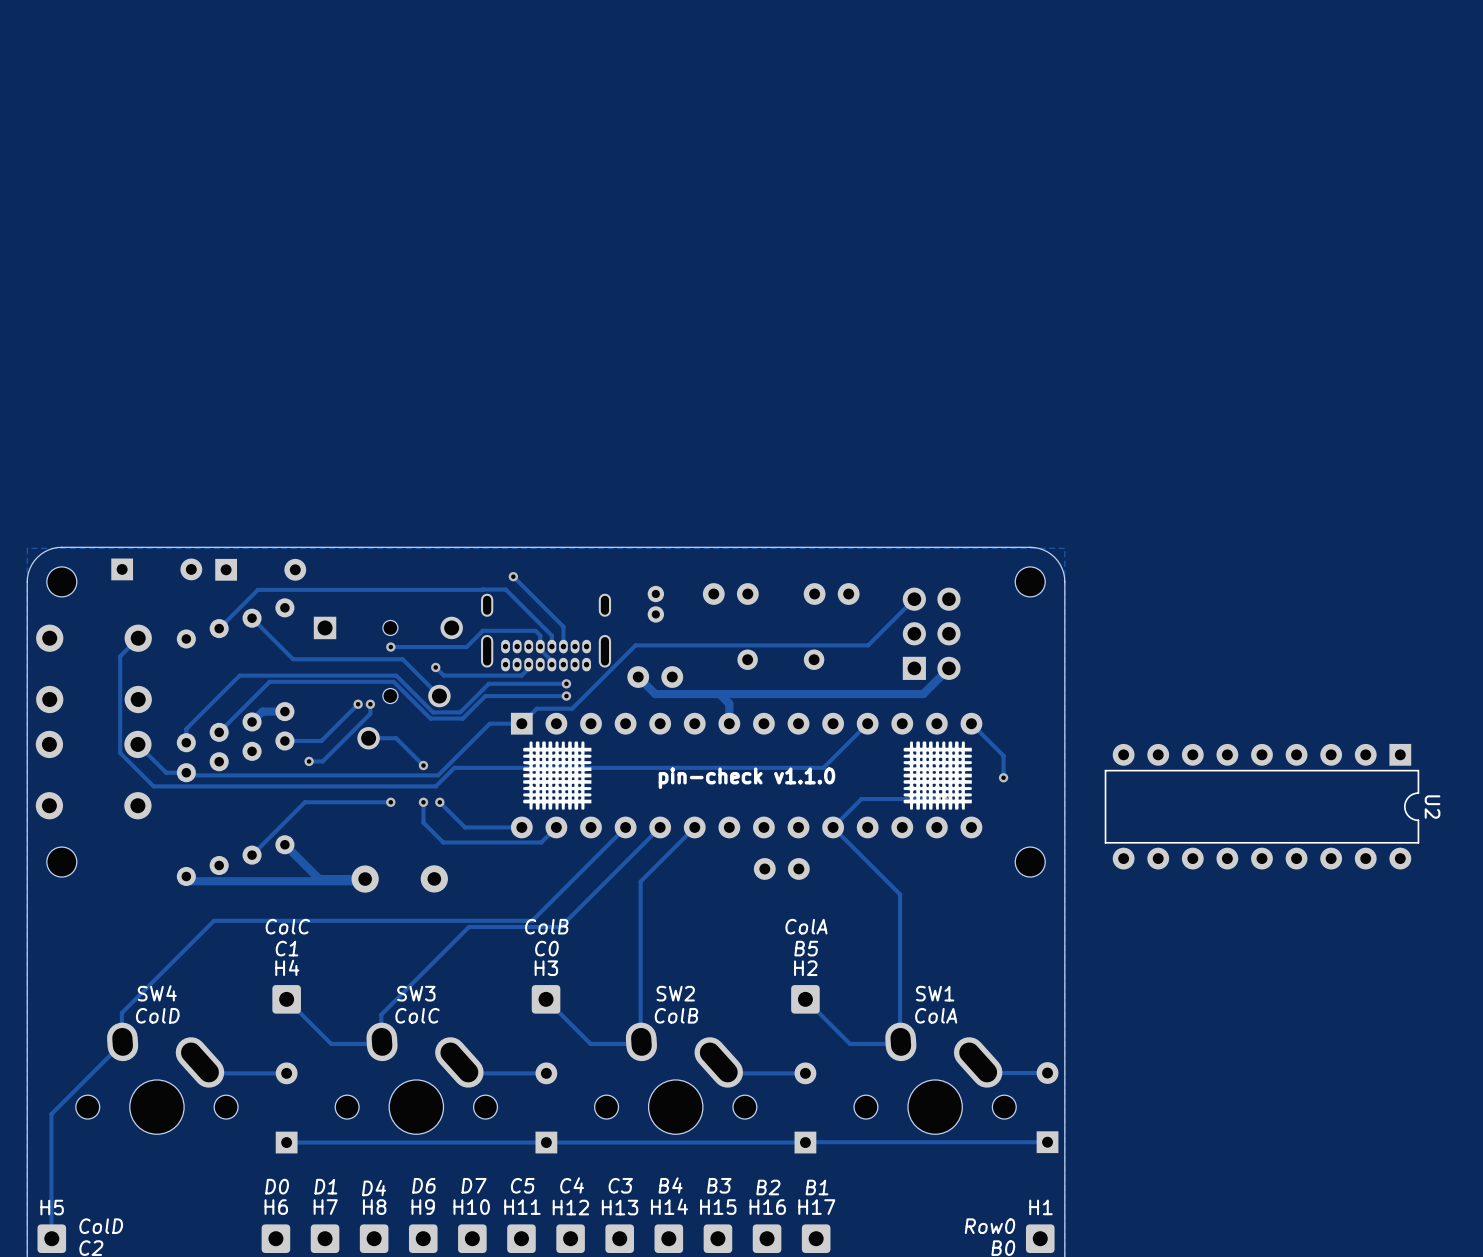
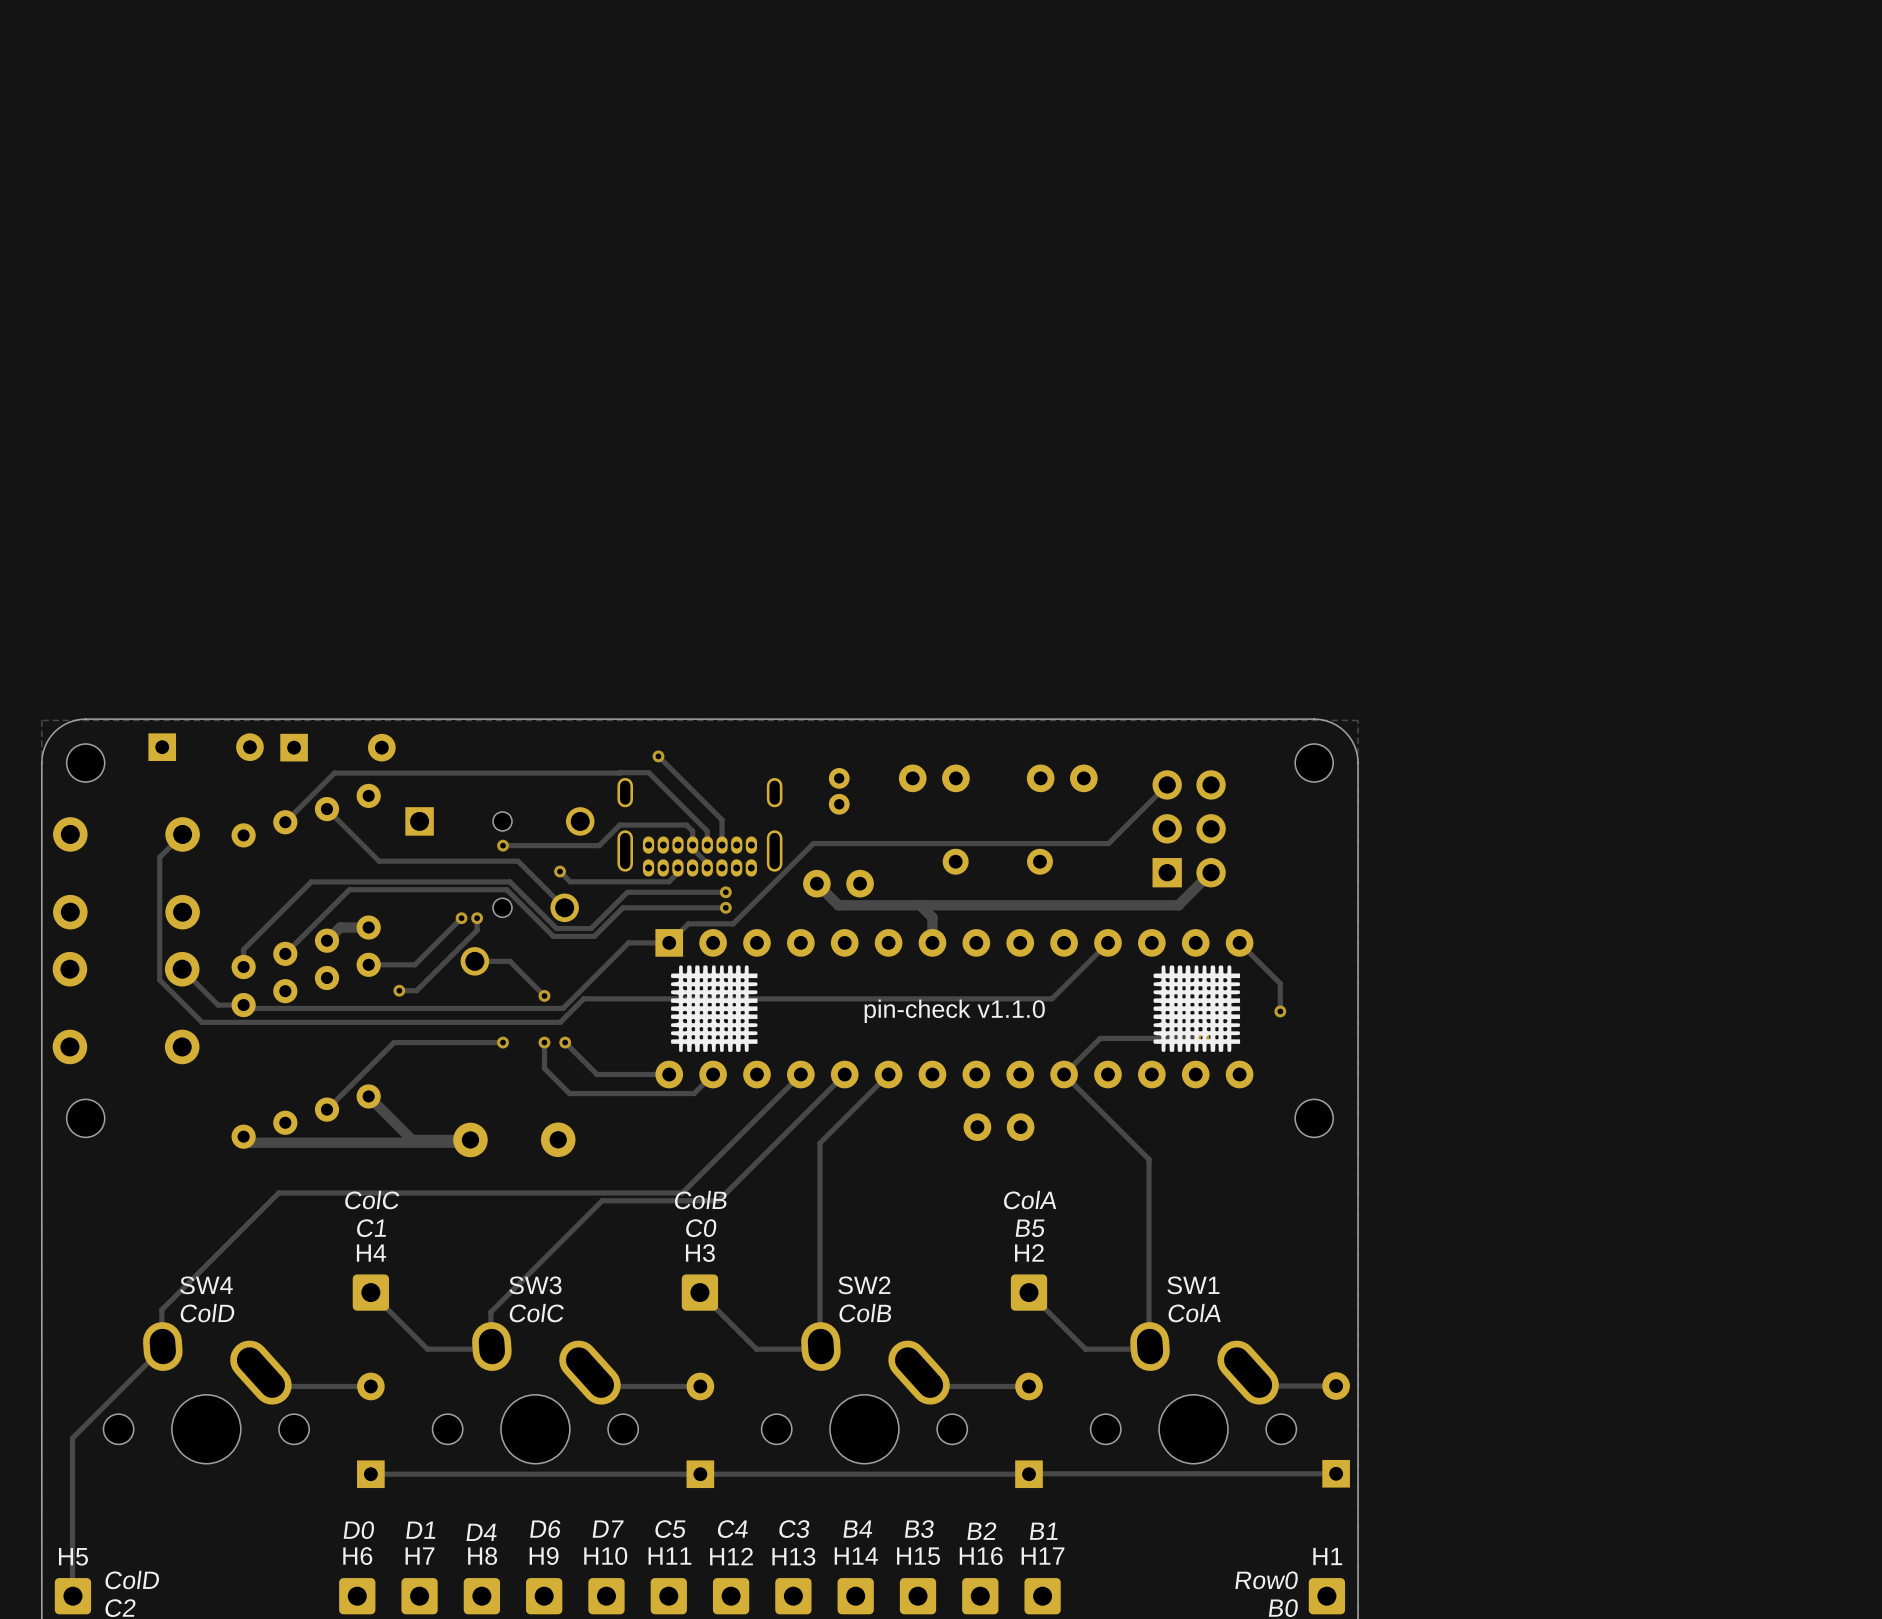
U2: (1261, 806) -> none

